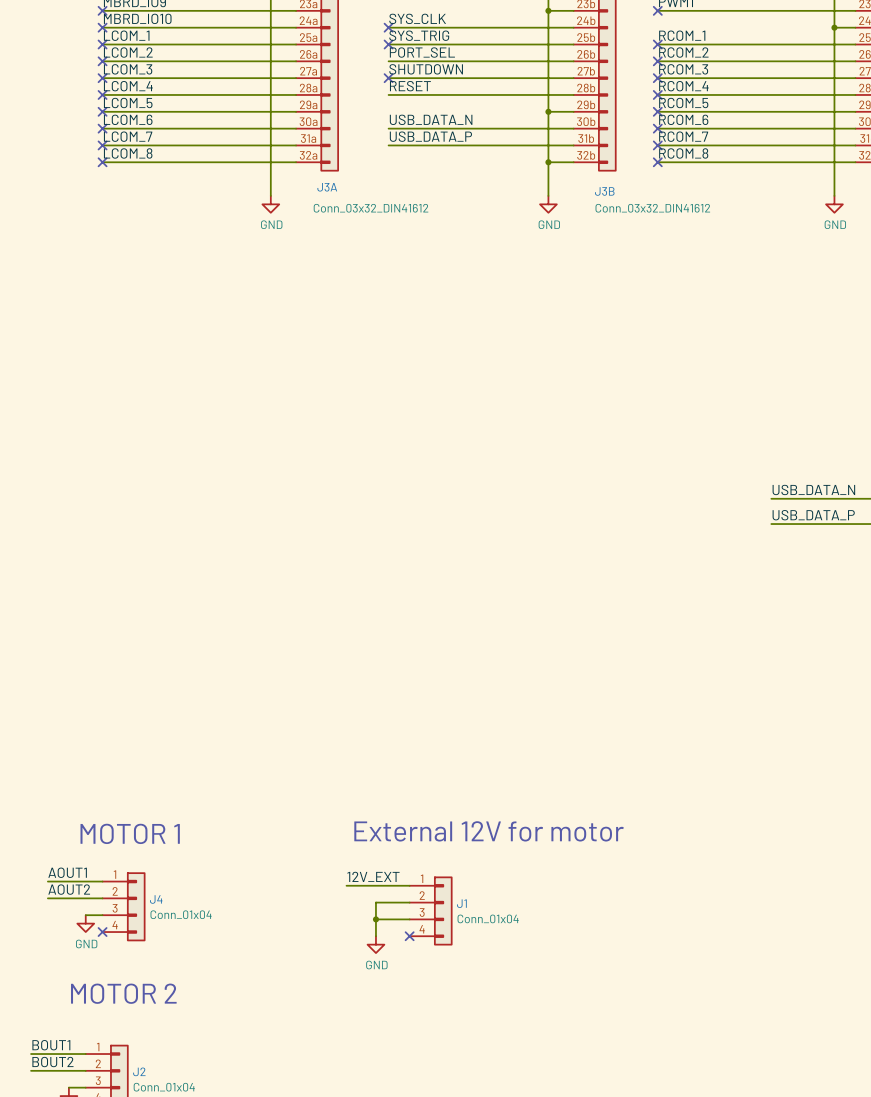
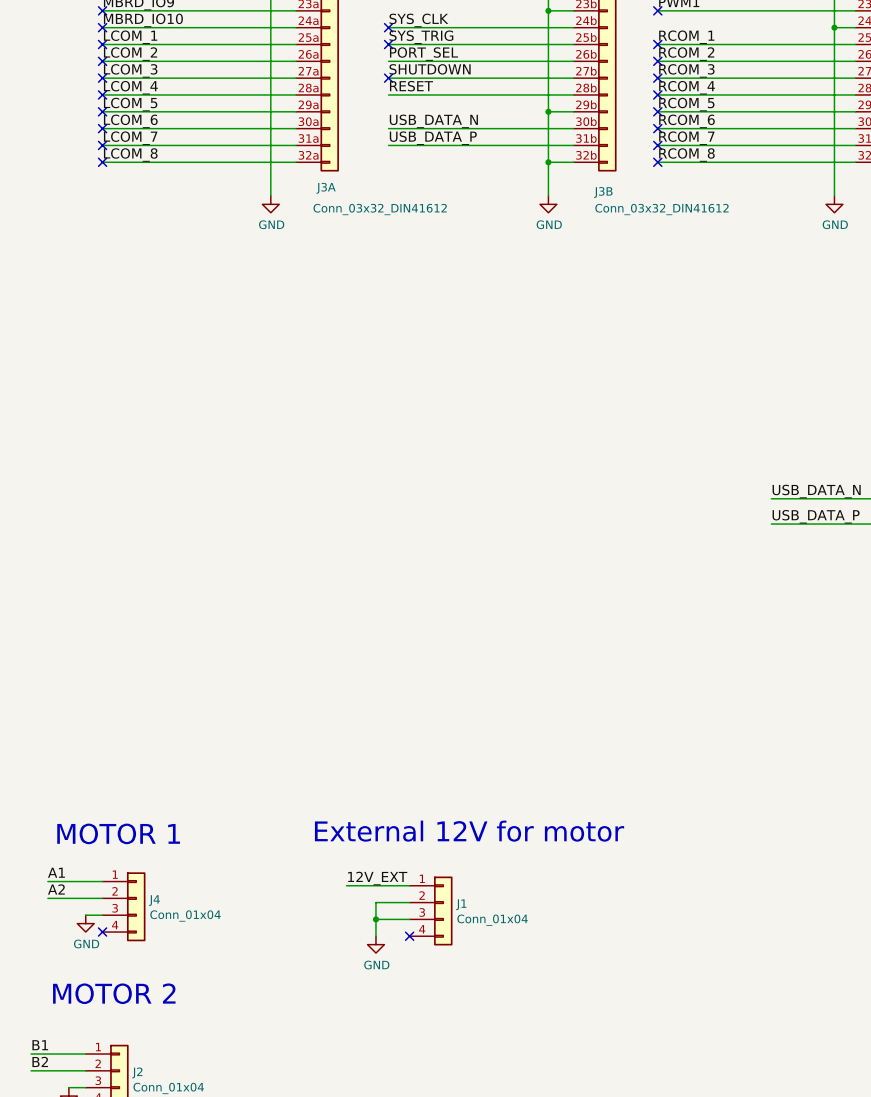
label: AOUT1 (67, 872) -> A1 (56, 872)
label: AOUT2 (69, 889) -> A2 (56, 889)
label: BOUT1 (51, 1045) -> B1 (40, 1045)
label: BOUT2 (52, 1062) -> B2 (40, 1061)

